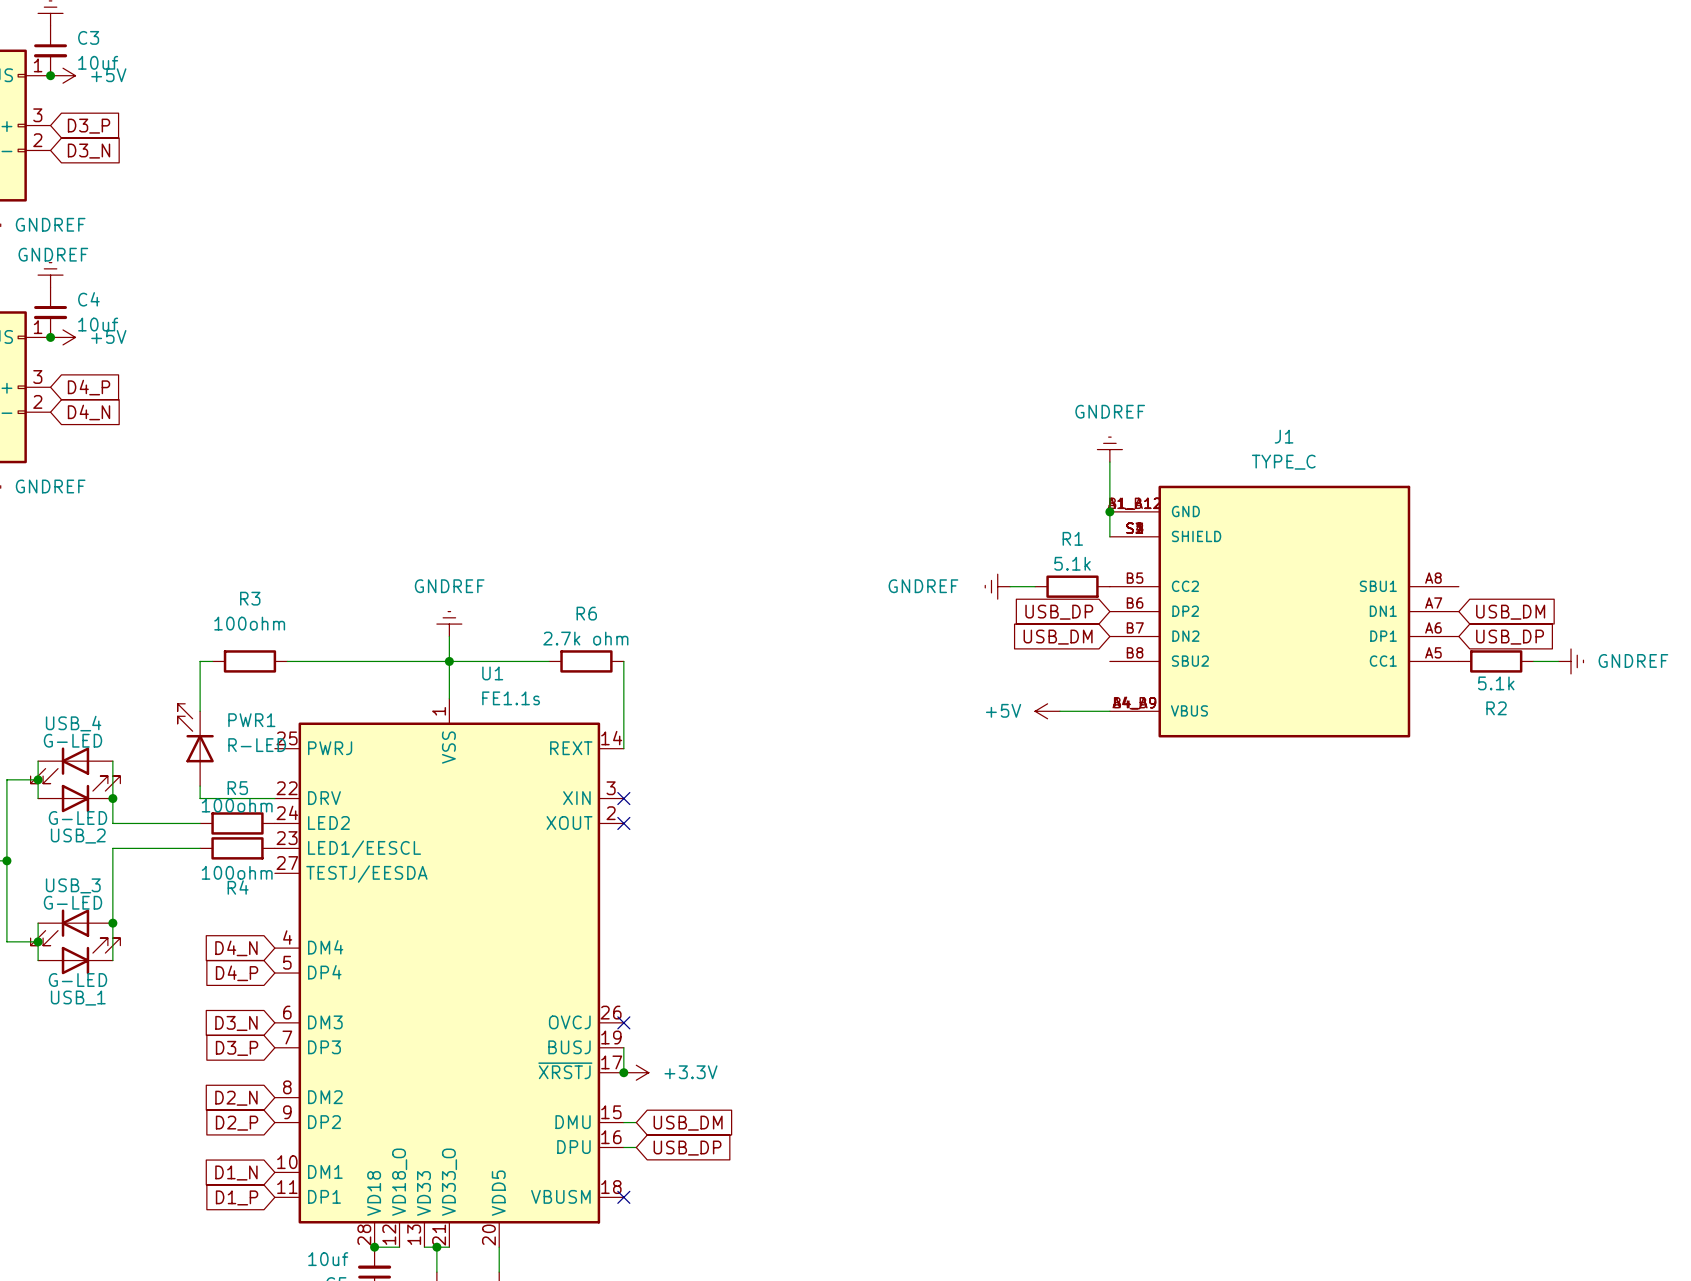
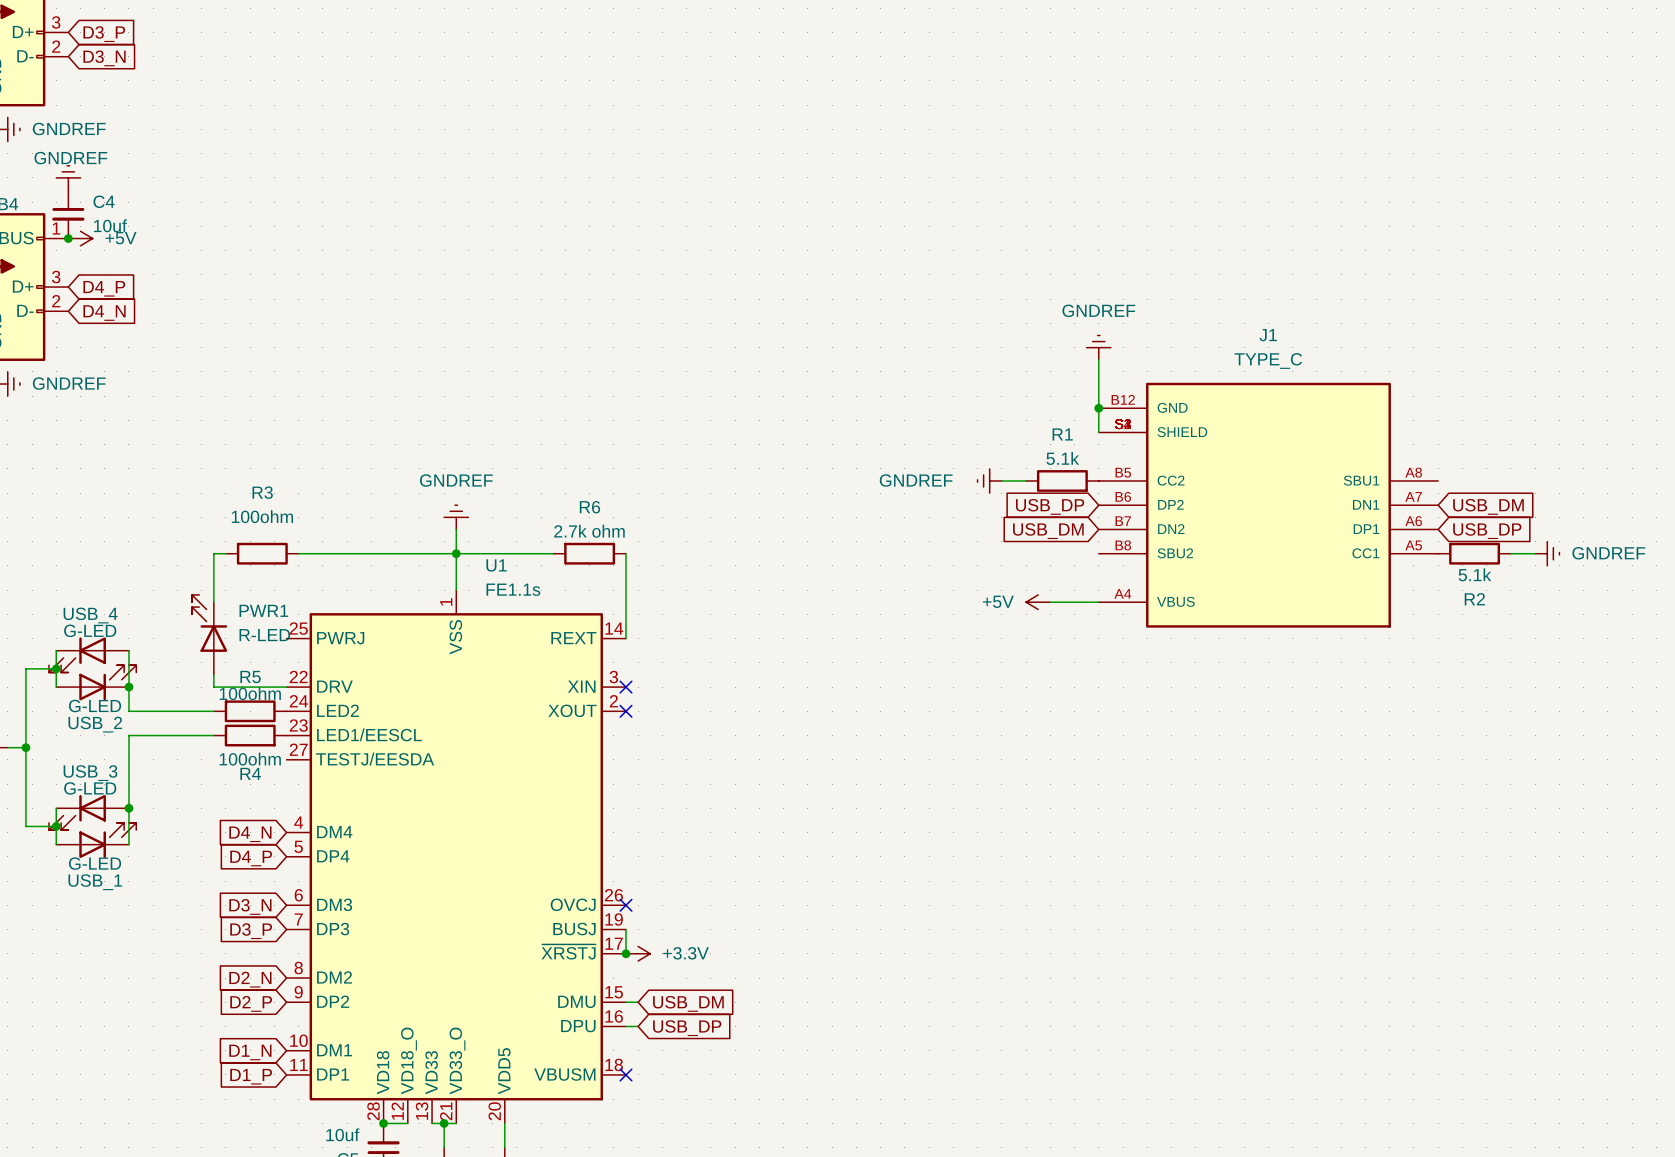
J1 symbol: [1109, 485, 1459, 738] -> [1098, 382, 1439, 628]

